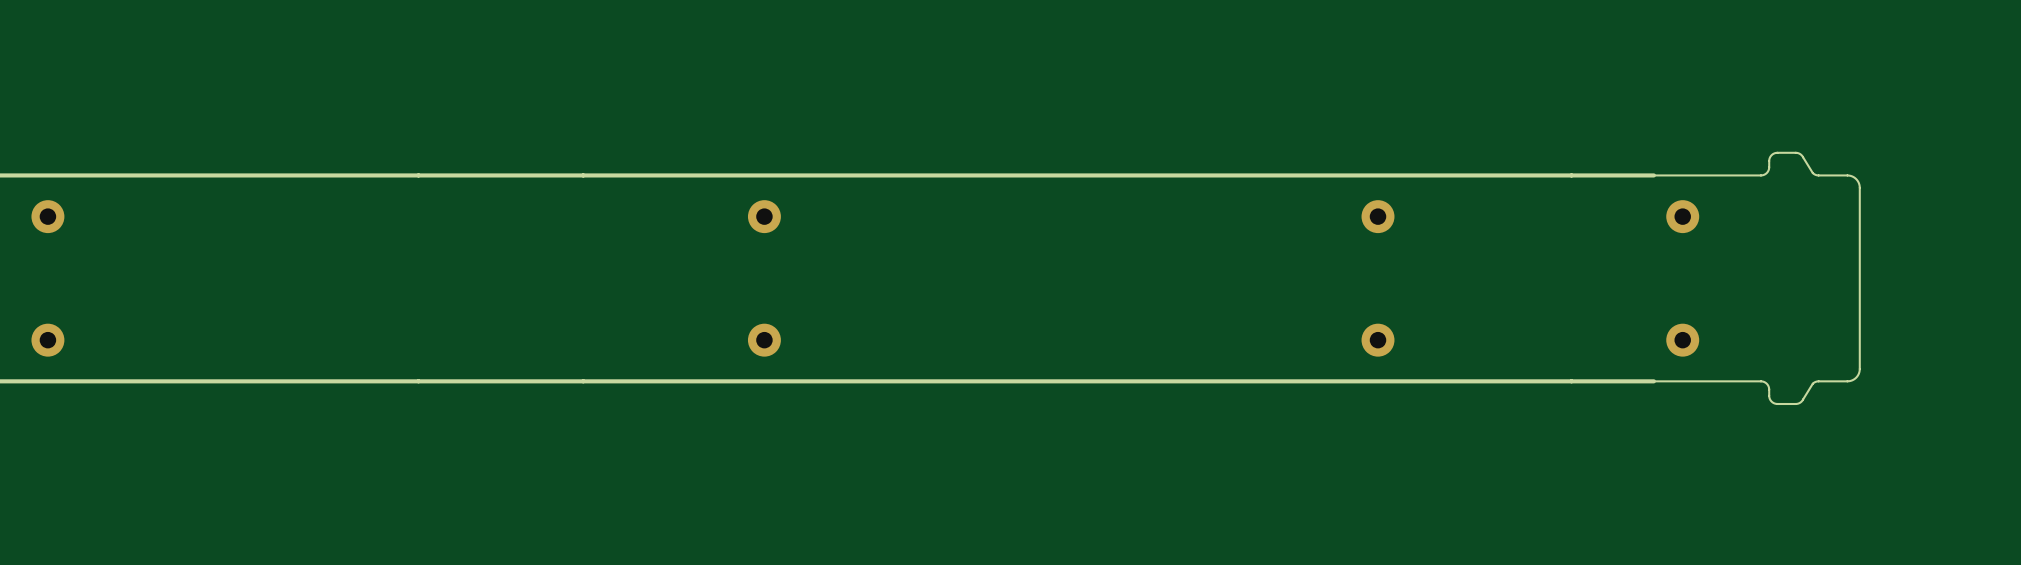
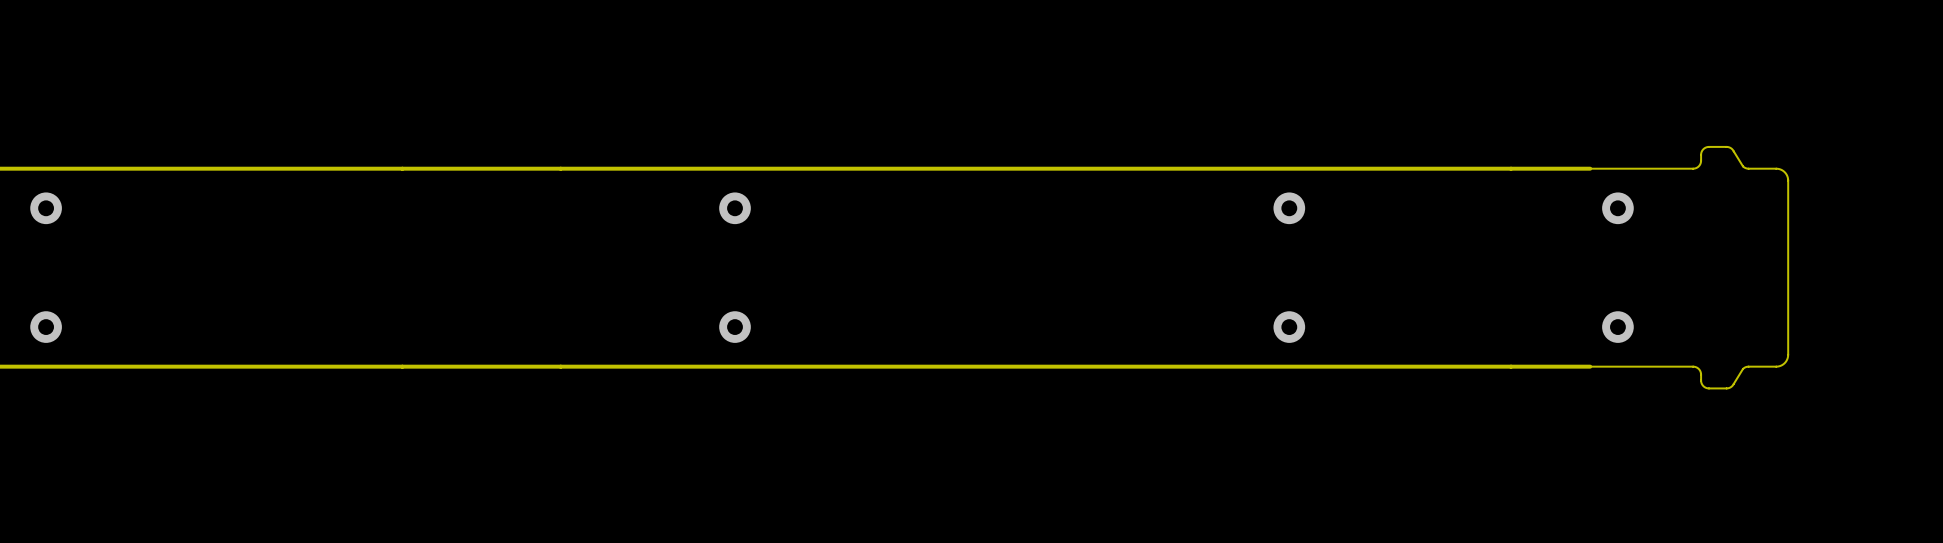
via position: (1378, 216) -> (1289, 208)
via position: (1378, 340) -> (1289, 327)

